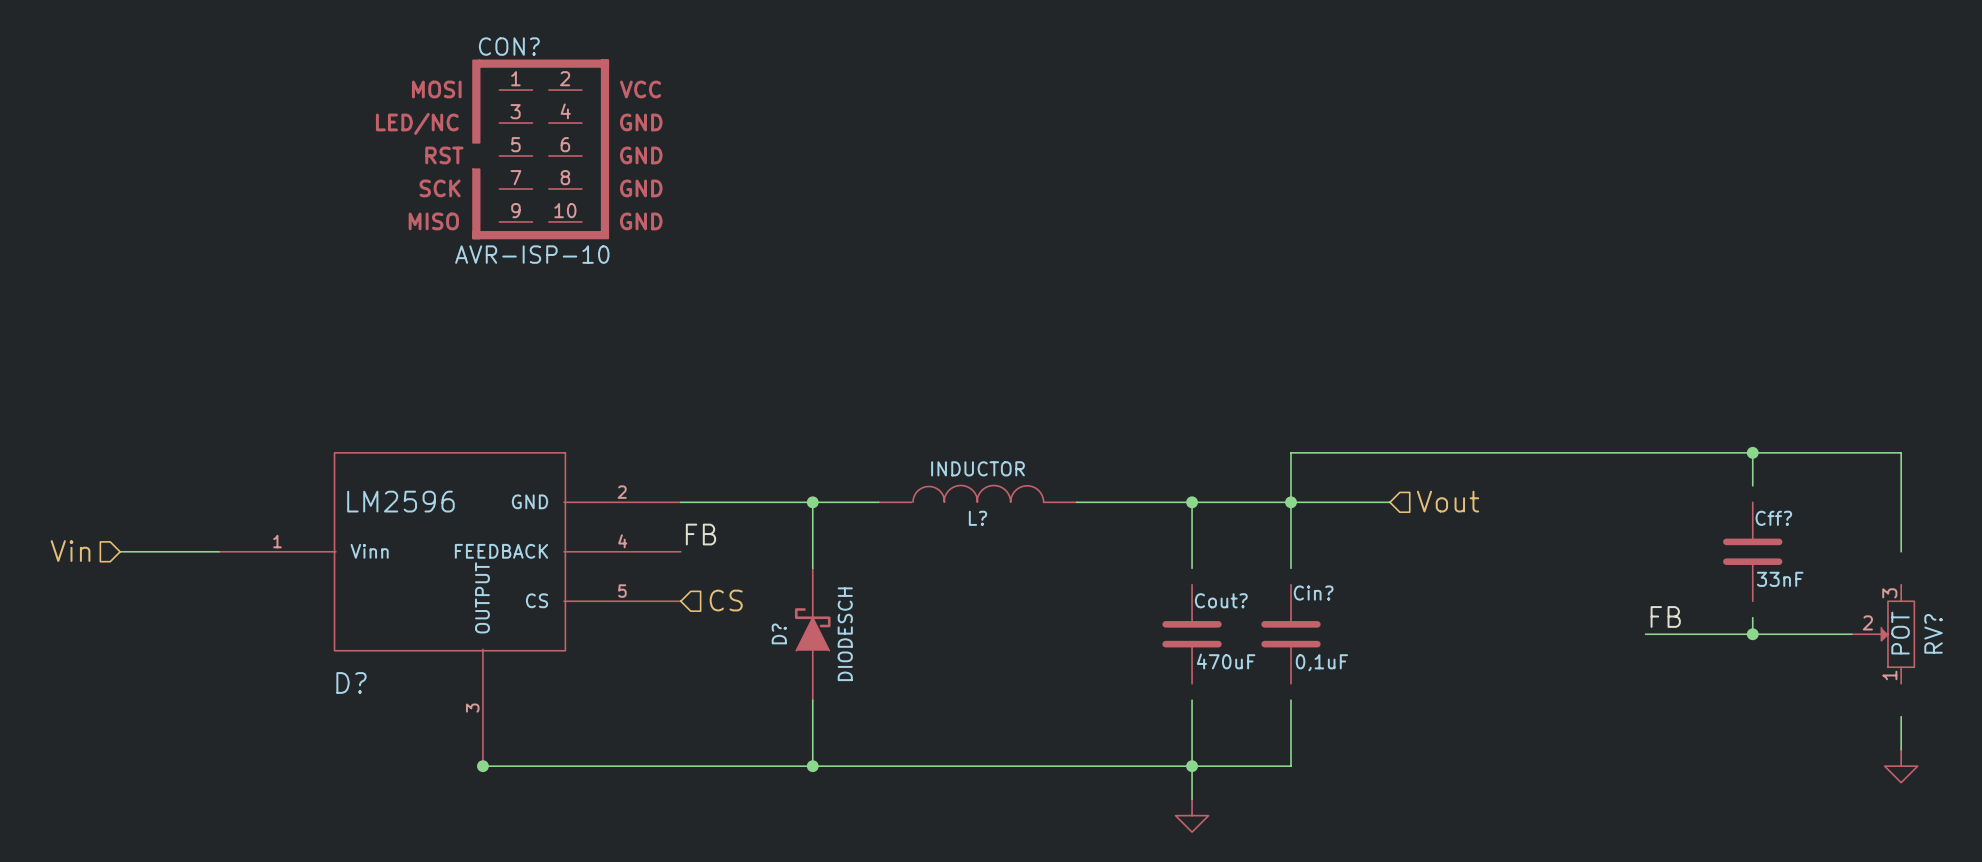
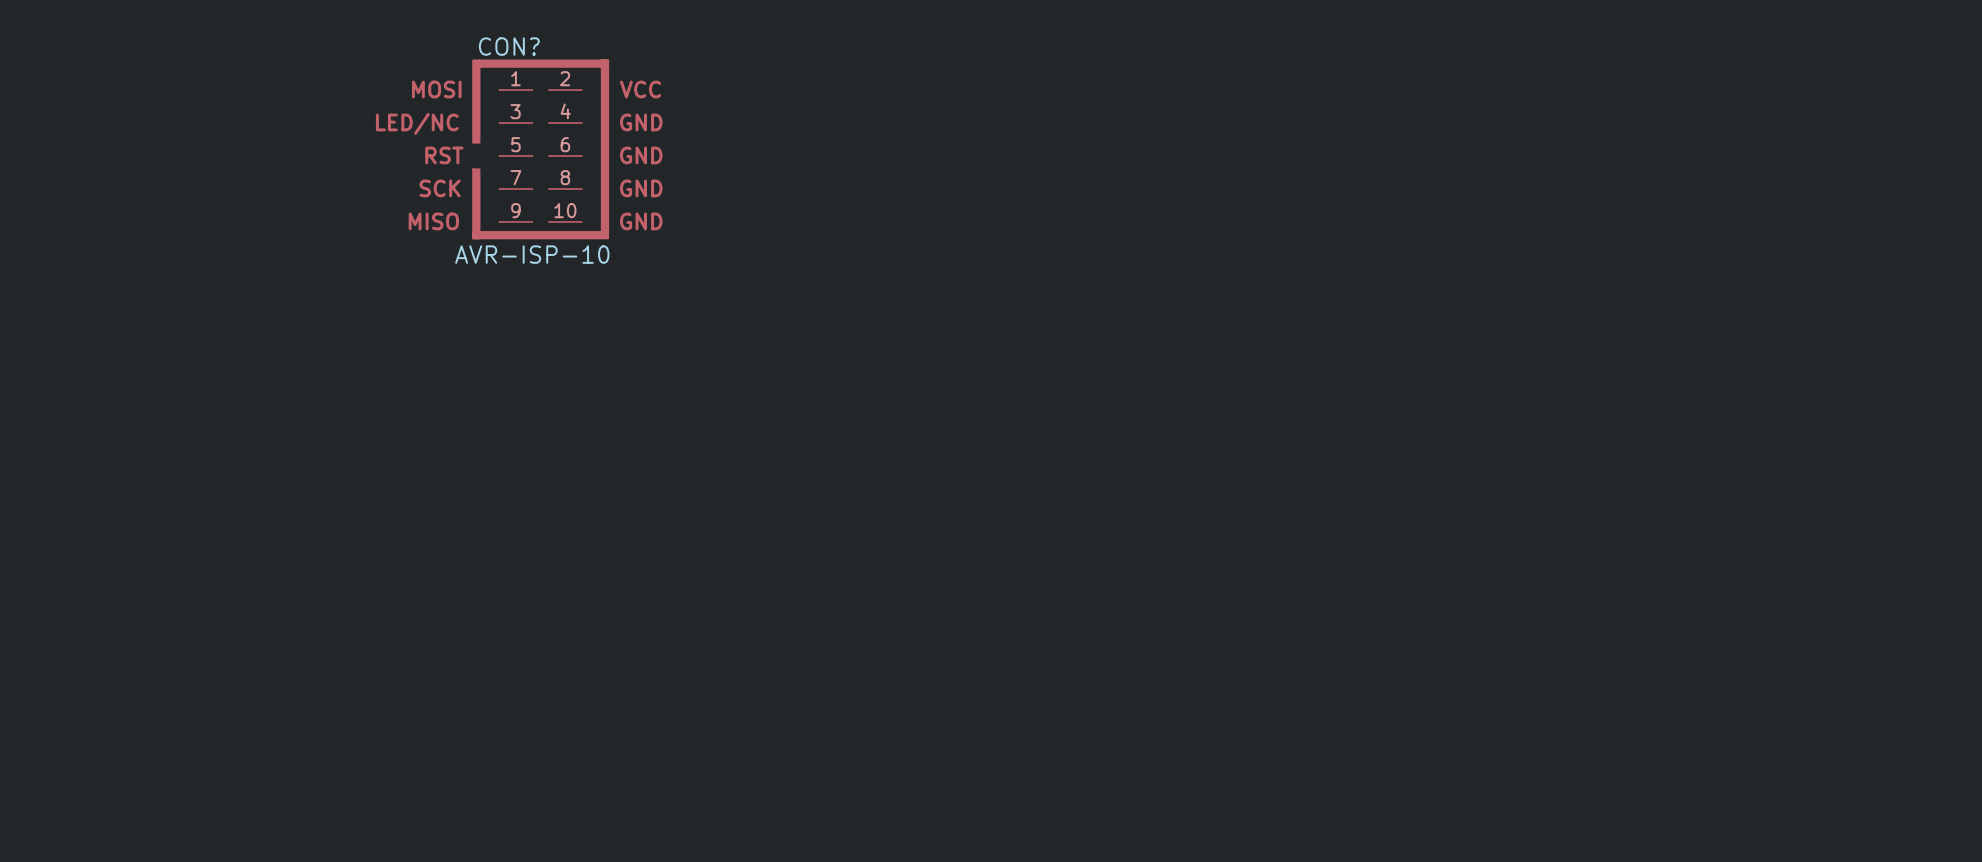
wire: (1752, 452) (1752, 485) -> none
junction: (1752, 452) -> none
L?: INDUCTOR (977, 493) -> none
hierarchical label: Vout (1448, 501) -> none
wire: (680, 502) (878, 502) -> none
wire: (812, 502) (812, 568) -> none
junction: (812, 502) -> none
wire: (1076, 502) (1389, 502) -> none
wire: (1192, 502) (1192, 568) -> none
junction: (1192, 502) -> none
junction: (1291, 502) -> none
label: FB (700, 534) -> none
hierarchical label: Vin (70, 551) -> none
wire: (120, 551) (219, 551) -> none
Cff?: 33nF (1752, 551) -> none
wire: (1901, 551) (1901, 452) (1291, 452) (1291, 568) -> none
hierarchical label: CS (726, 600) -> none
D?: LM2596 (449, 609) -> none
label: FB (1665, 616) -> none
wire: (1752, 617) (1752, 634) -> none
D?: DIODESCH (812, 634) -> none
Cout?: 470uF (1192, 634) -> none
Cin?: 0,1uF (1291, 634) -> none
wire: (1645, 634) (1851, 634) -> none
junction: (1752, 634) -> none
RV?: POT (1883, 634) -> none
wire: (812, 700) (812, 766) -> none
wire: (1192, 700) (1192, 799) -> none
wire: (1291, 700) (1291, 766) (482, 766) -> none
wire: (1901, 716) (1901, 749) -> none
junction: (482, 766) -> none
junction: (812, 766) -> none
junction: (1192, 766) -> none
power symbol: (1901, 766) -> none
power symbol: (1192, 815) -> none

